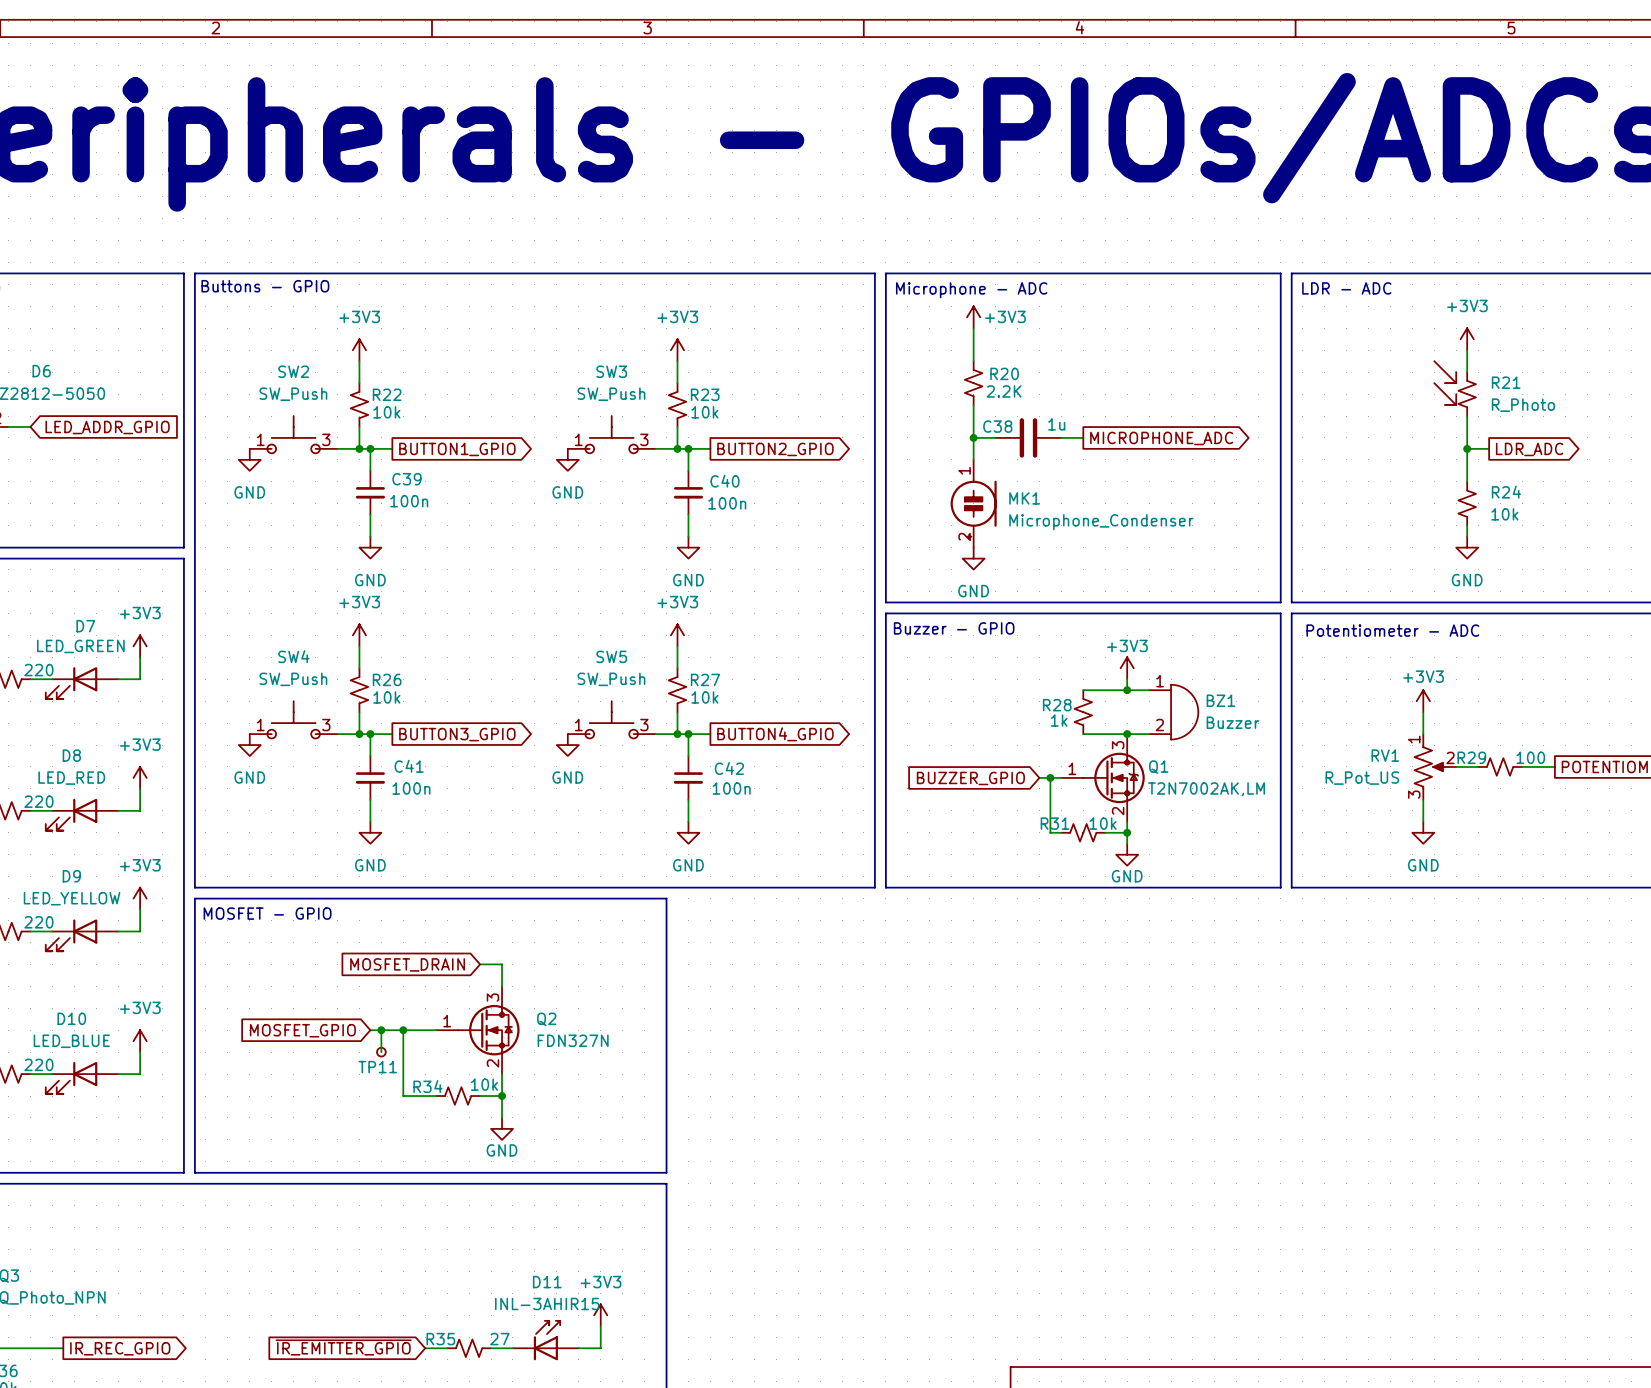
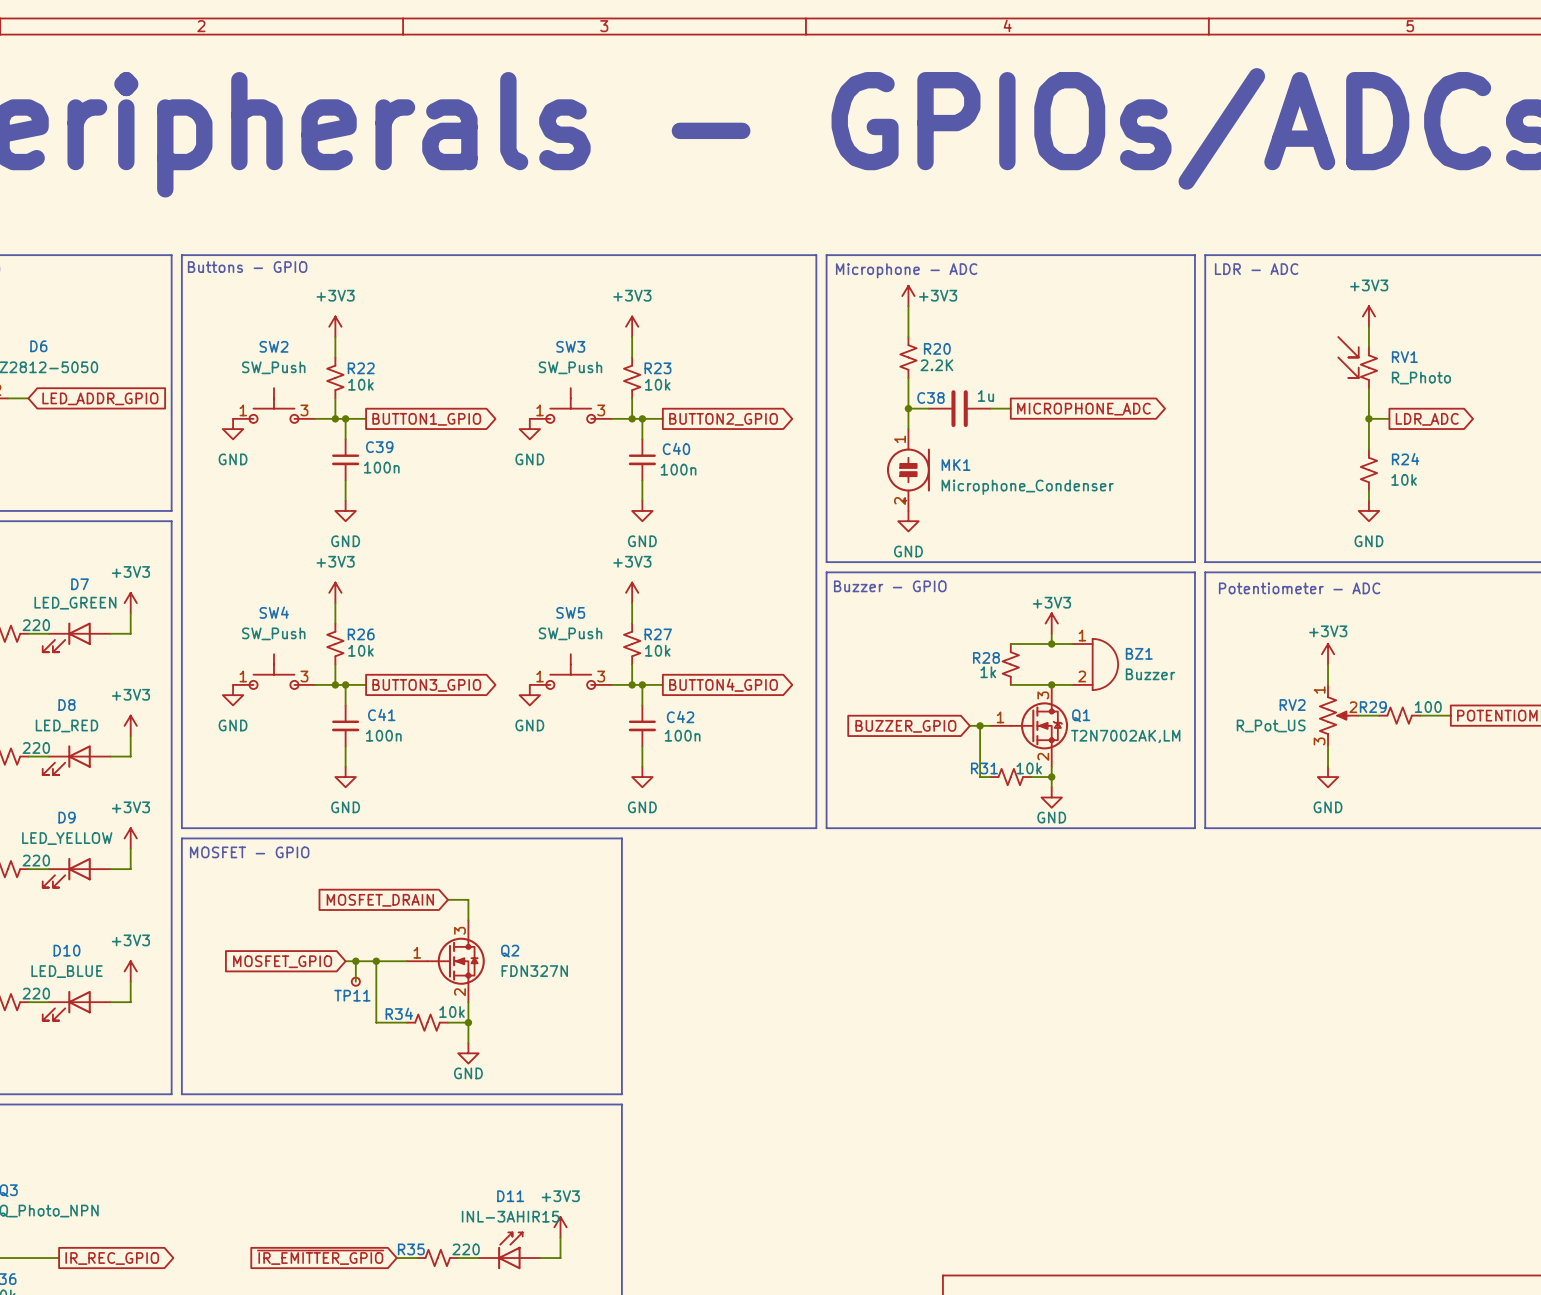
R21 name: R21 (1506, 382) -> RV1 (1404, 357)
RV1 name: RV1 (1385, 755) -> RV2 (1292, 705)
R35 value: 27 (499, 1339) -> 220 (466, 1249)

